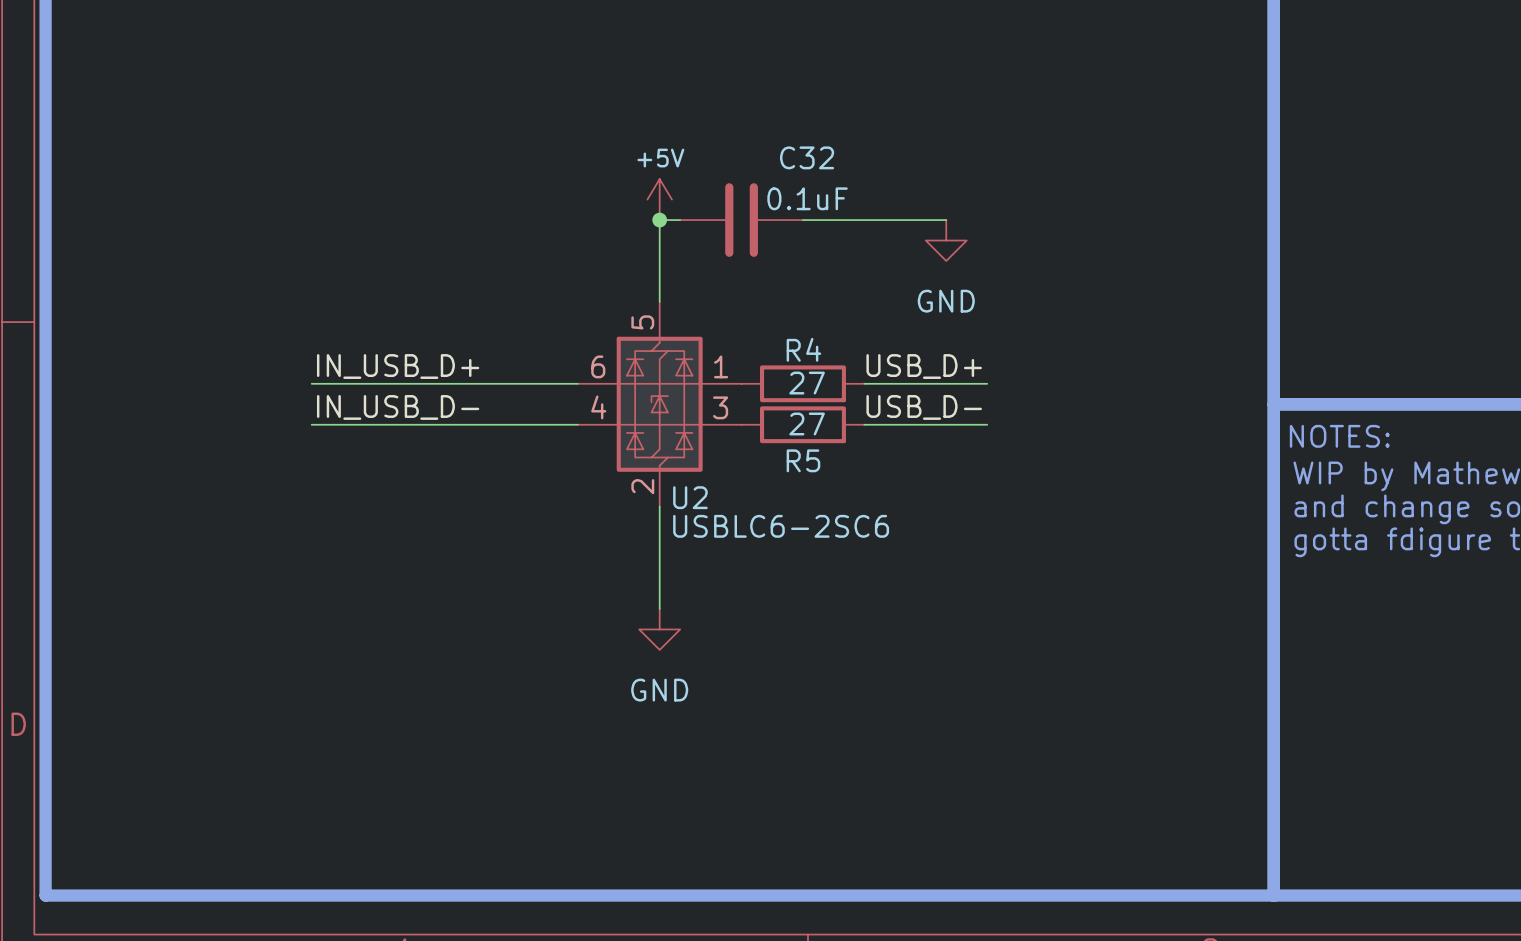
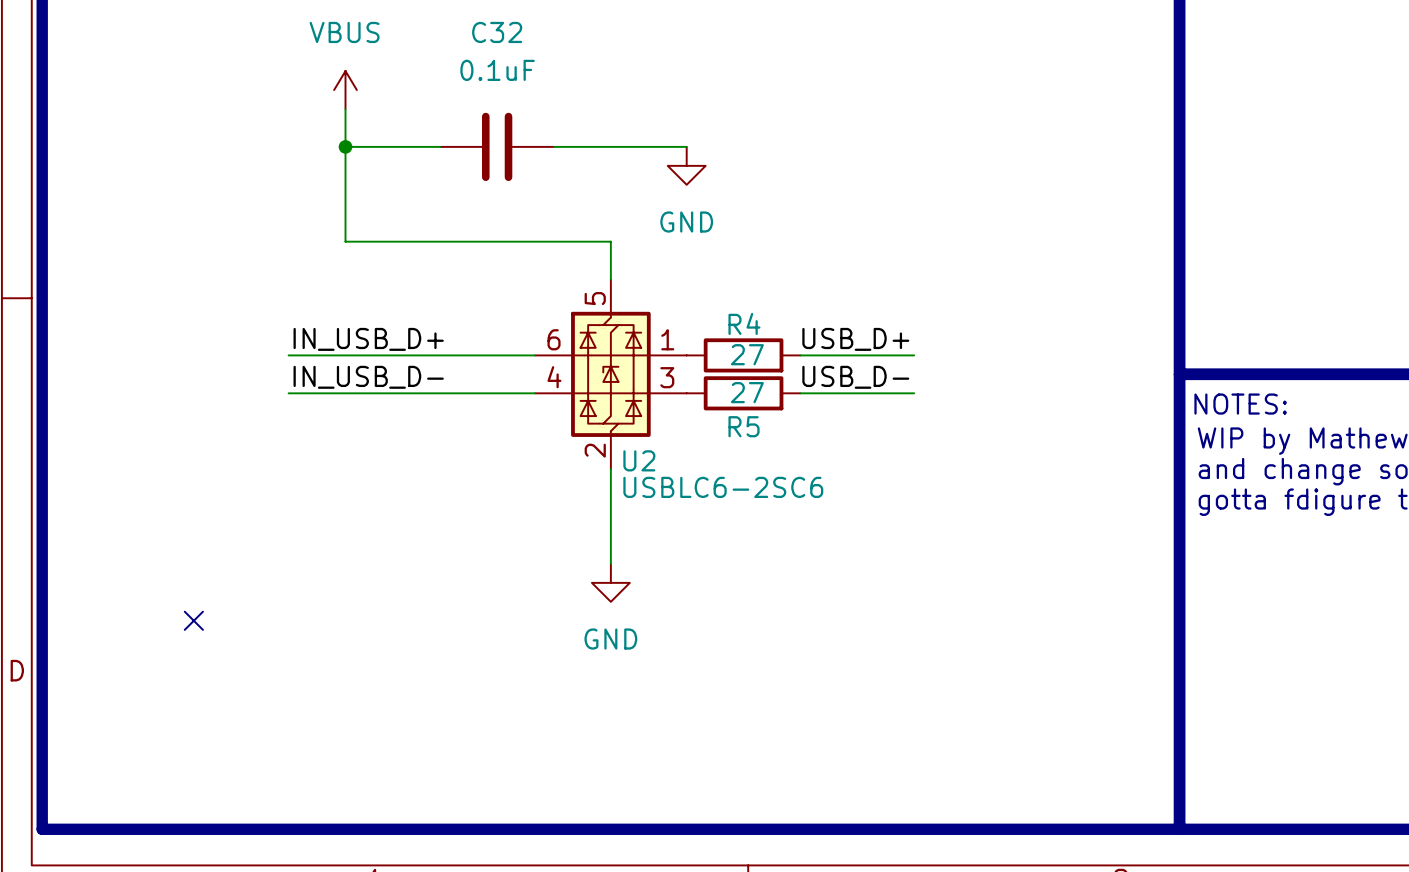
power symbol: none -> VBUS (345, 90)
C32 name position: C32 (807, 157) -> C32 (497, 32)
wire: none -> (345, 146) (440, 146)
junction: none -> (345, 146)
C32 value position: 0.1uF (807, 198) -> 0.1uF (497, 70)
power symbol: +5V (659, 199) -> none
junction: (659, 220) -> none
wire: (680, 220) (659, 220) (659, 260) -> (345, 108) (345, 241) (610, 241)
C32 position: (741, 220) -> (497, 146)
wire: (802, 220) (946, 220) -> (554, 146) (686, 146)
power symbol position: GND (946, 240) -> GND (686, 165)
no-connect mark: none -> (193, 620)

